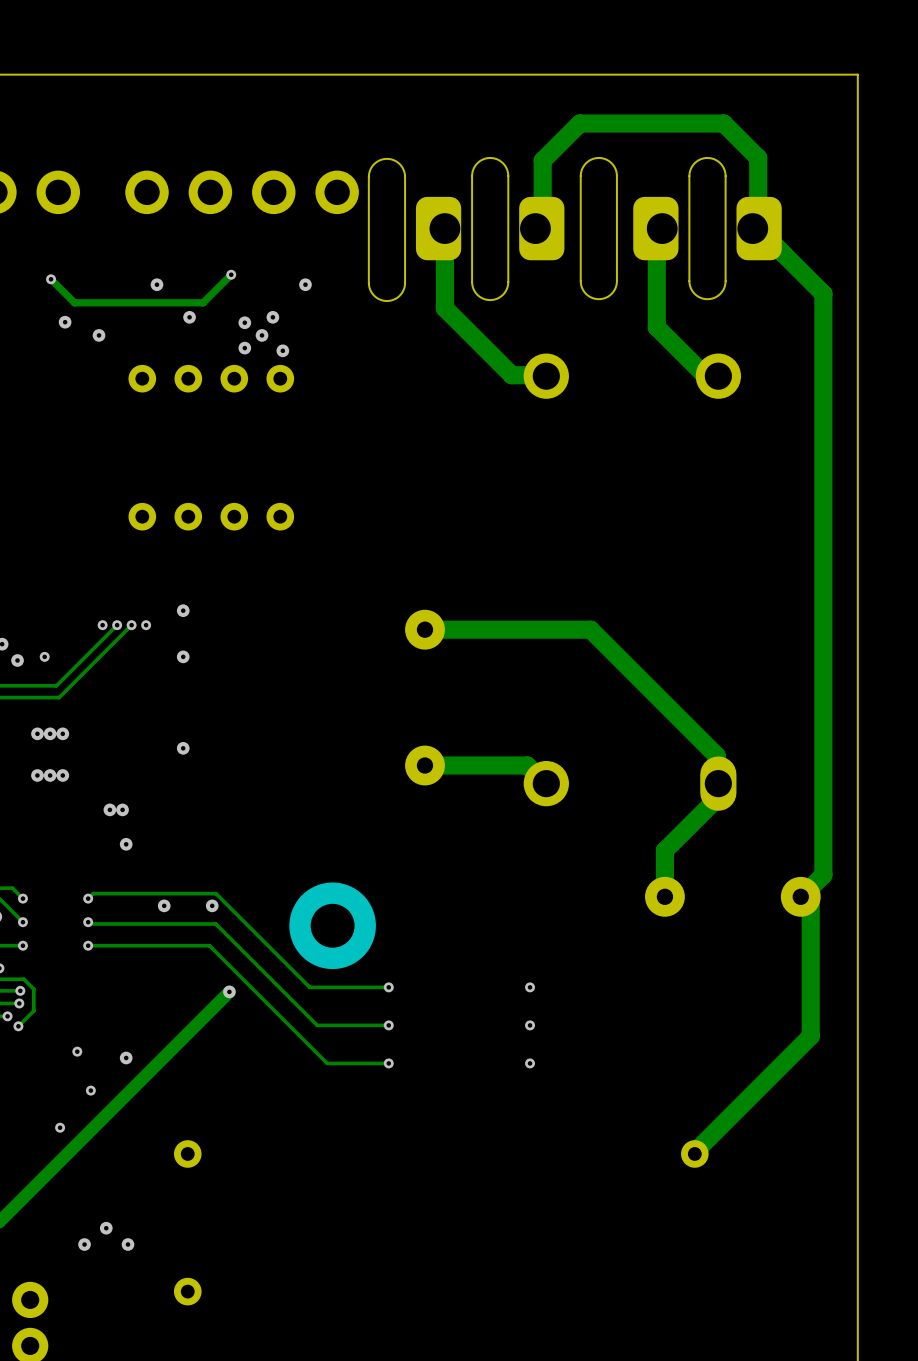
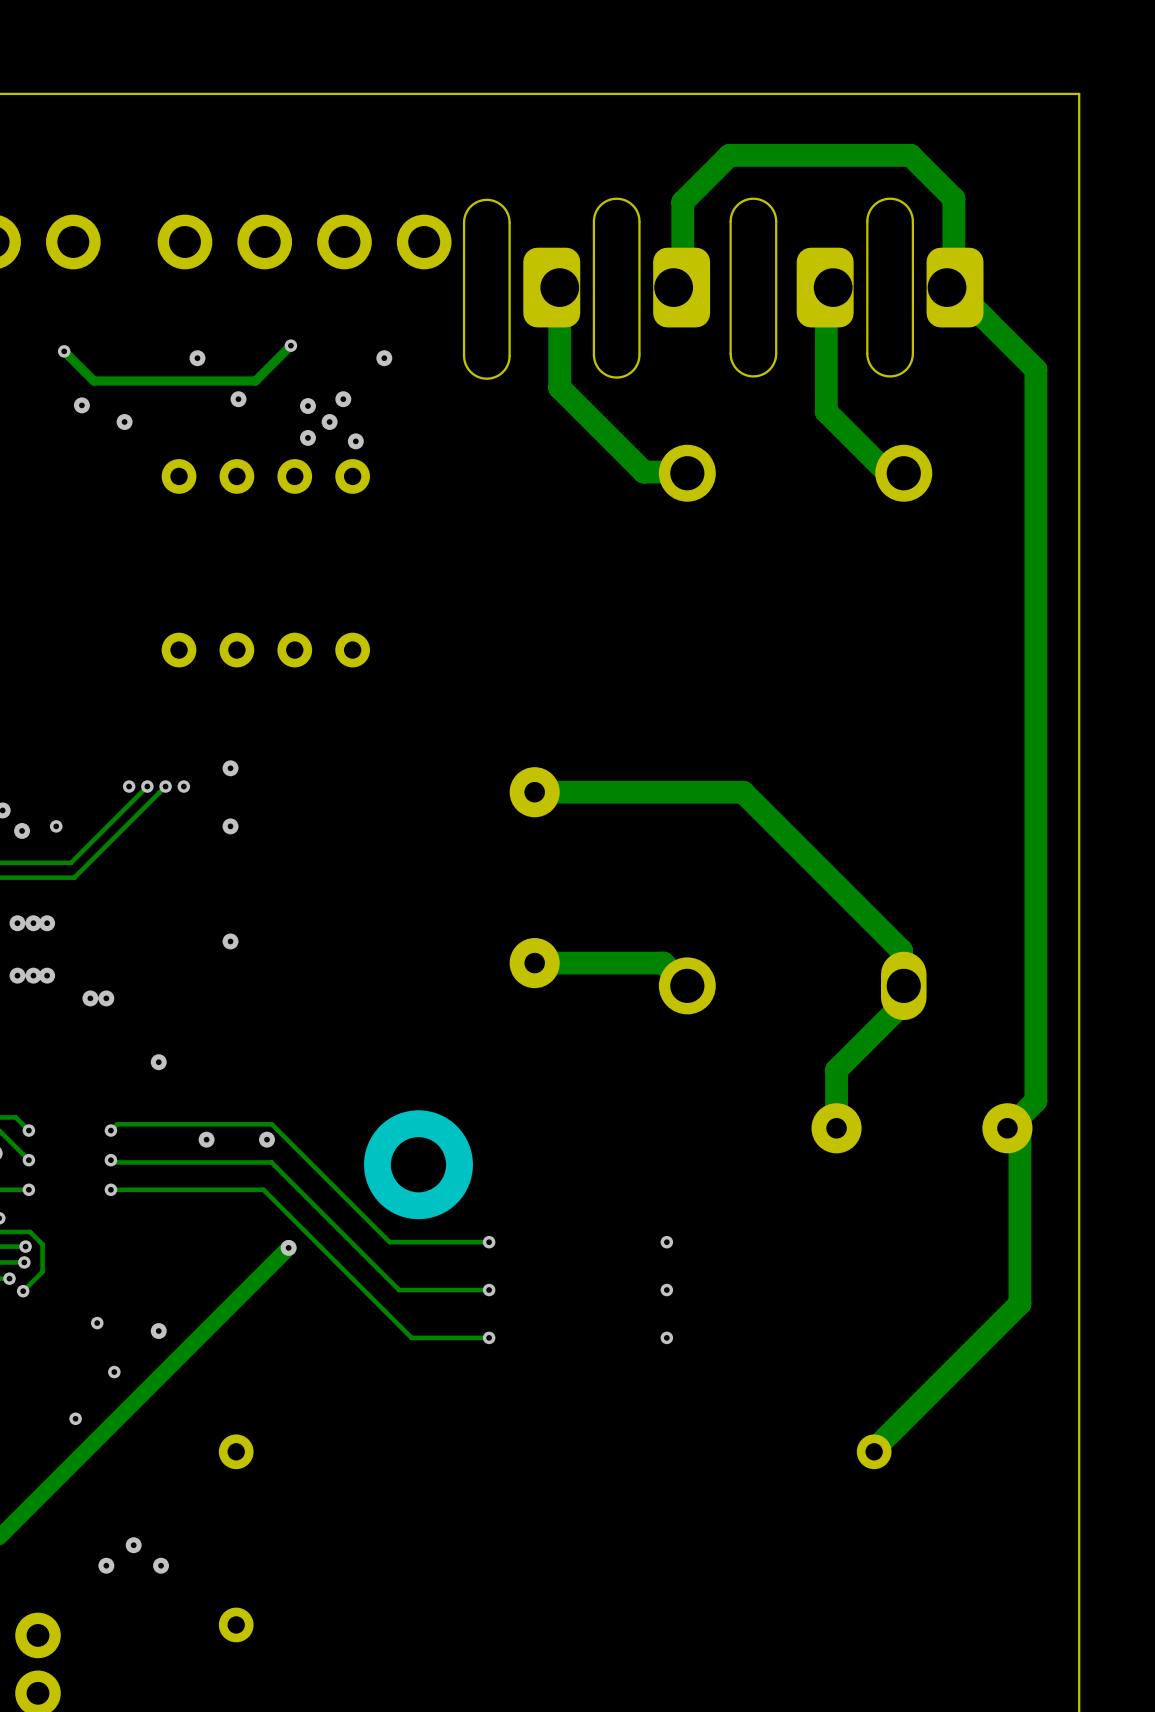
via: none -> (17, 923)
via: none -> (33, 923)
via: (50, 733) -> none
via: (62, 733) -> none
via: none -> (17, 975)
via: none -> (33, 975)
via: (50, 775) -> none
via: (62, 775) -> none
via: none -> (90, 998)
via: none -> (106, 998)
via: (109, 809) -> none
via: (122, 809) -> none

